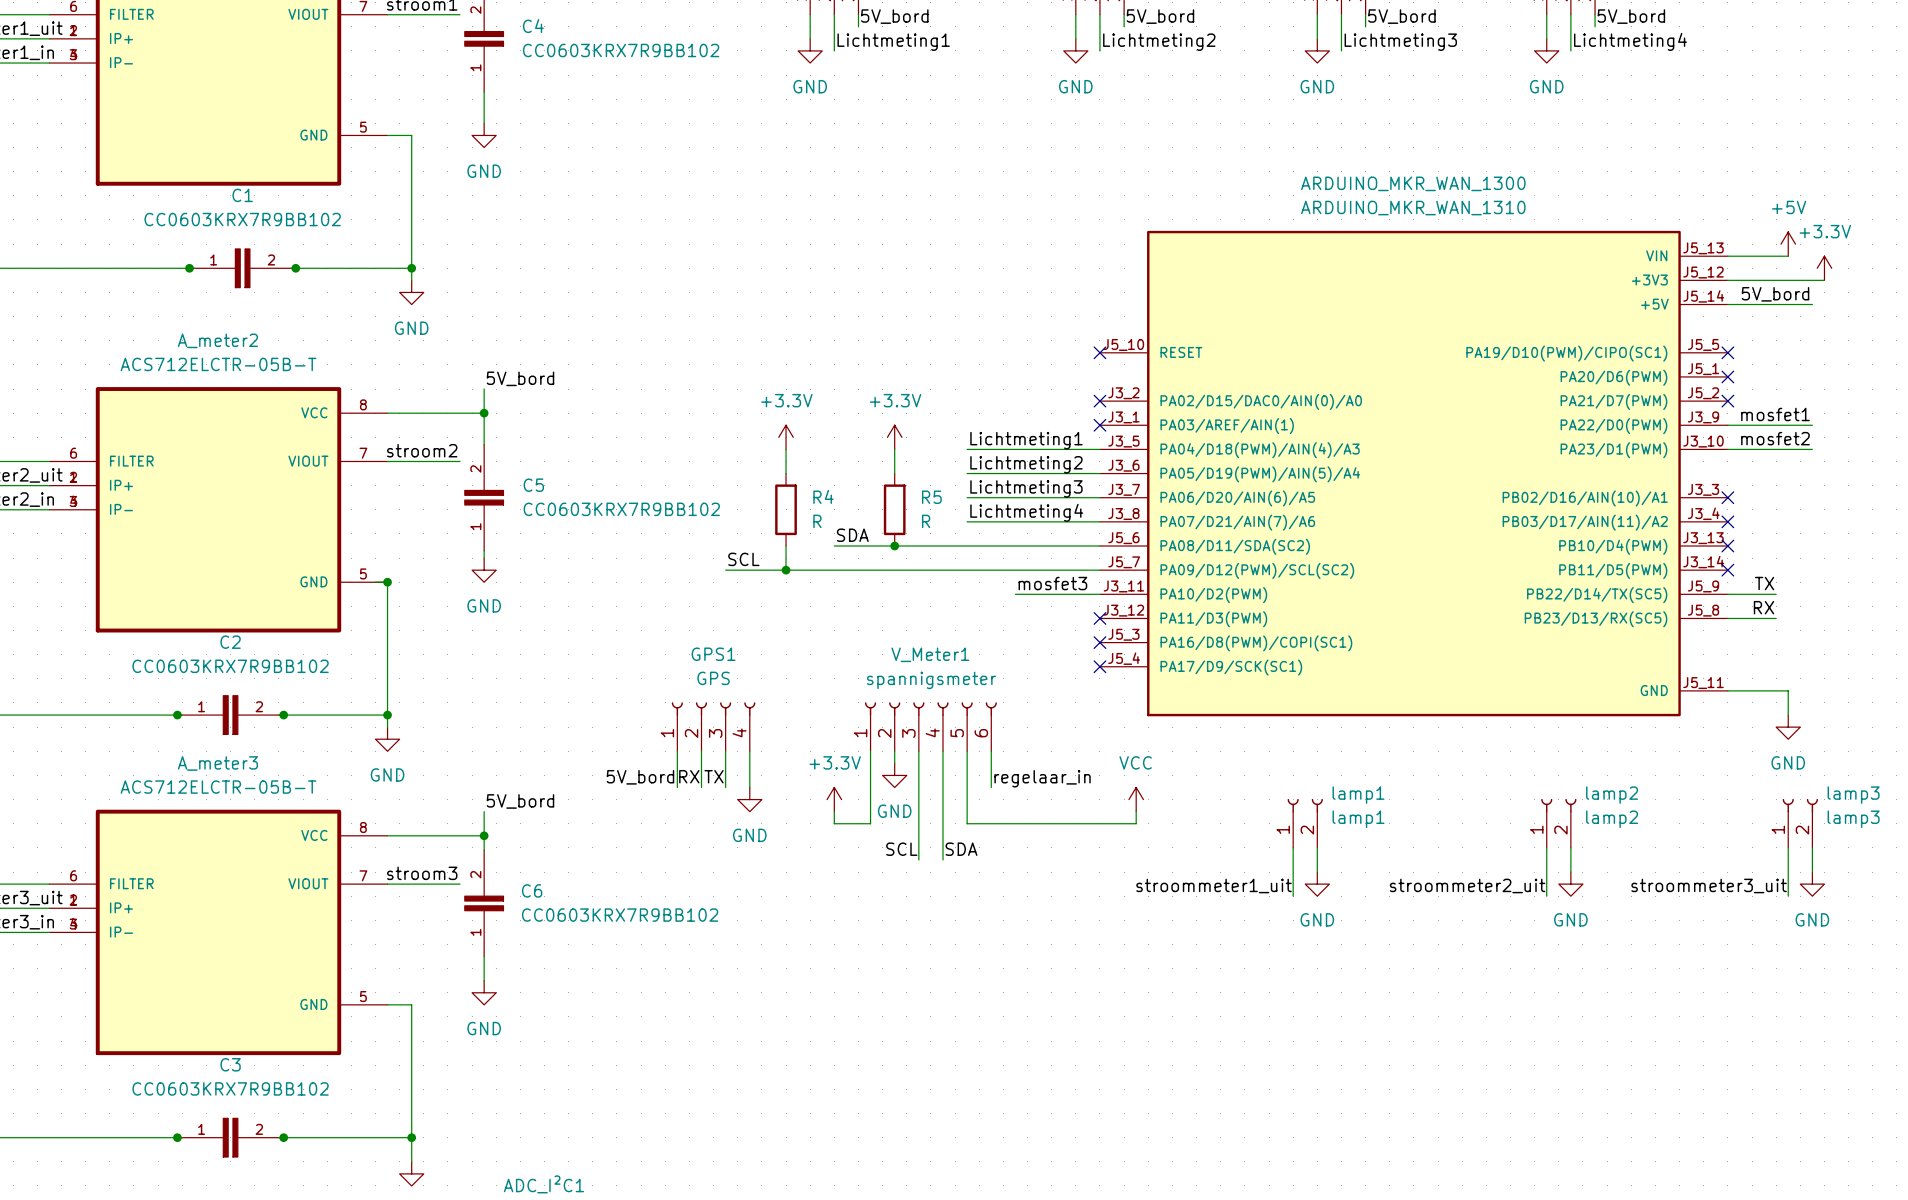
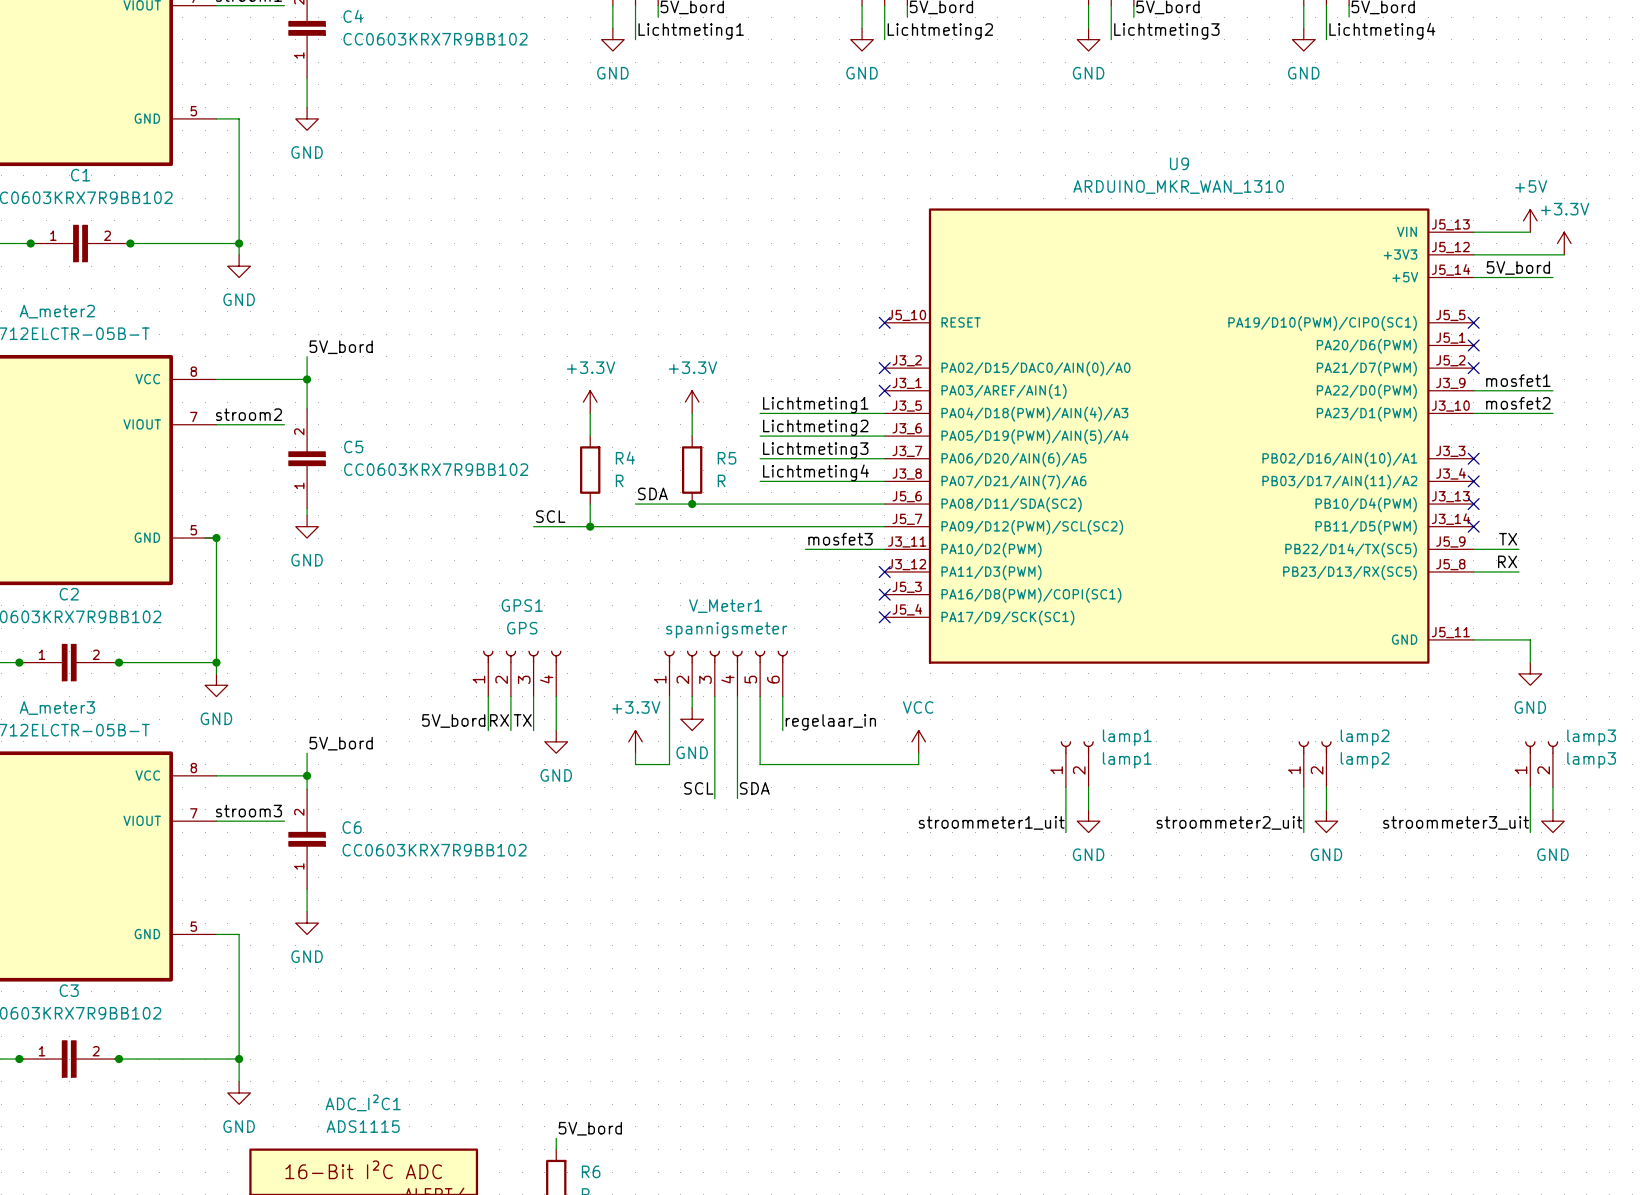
ARDUINO_MKR_WAN_1300 name: ARDUINO_MKR_WAN_1300 (1413, 183) -> U9 (1179, 163)

